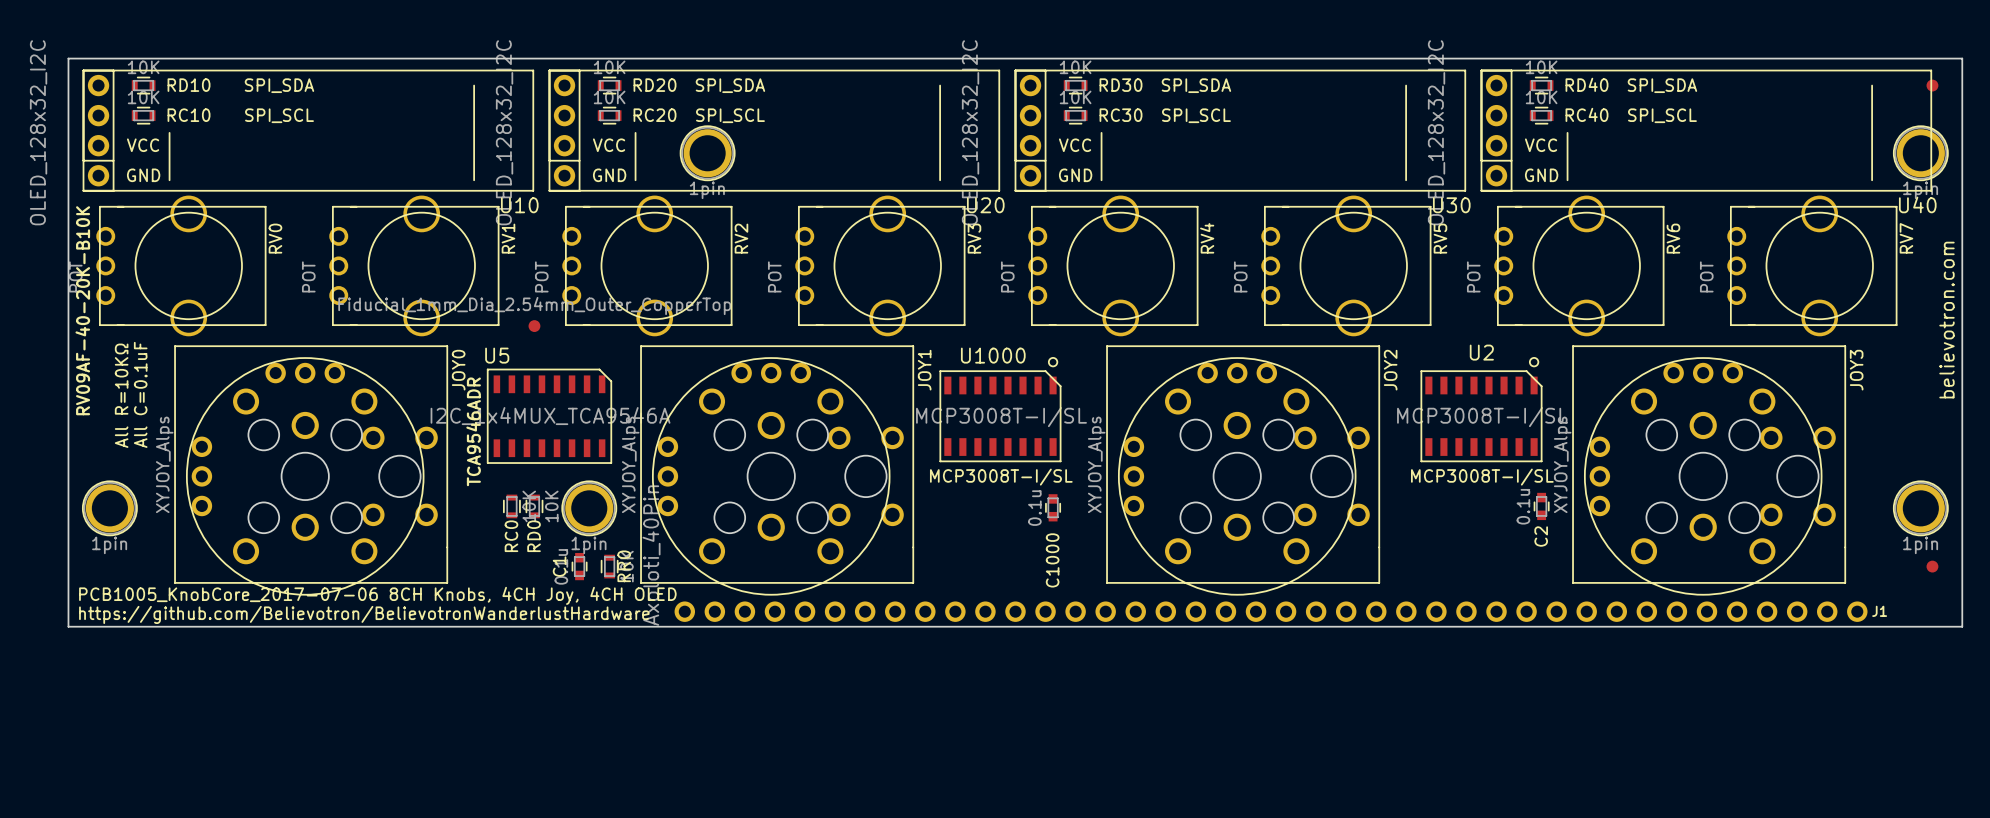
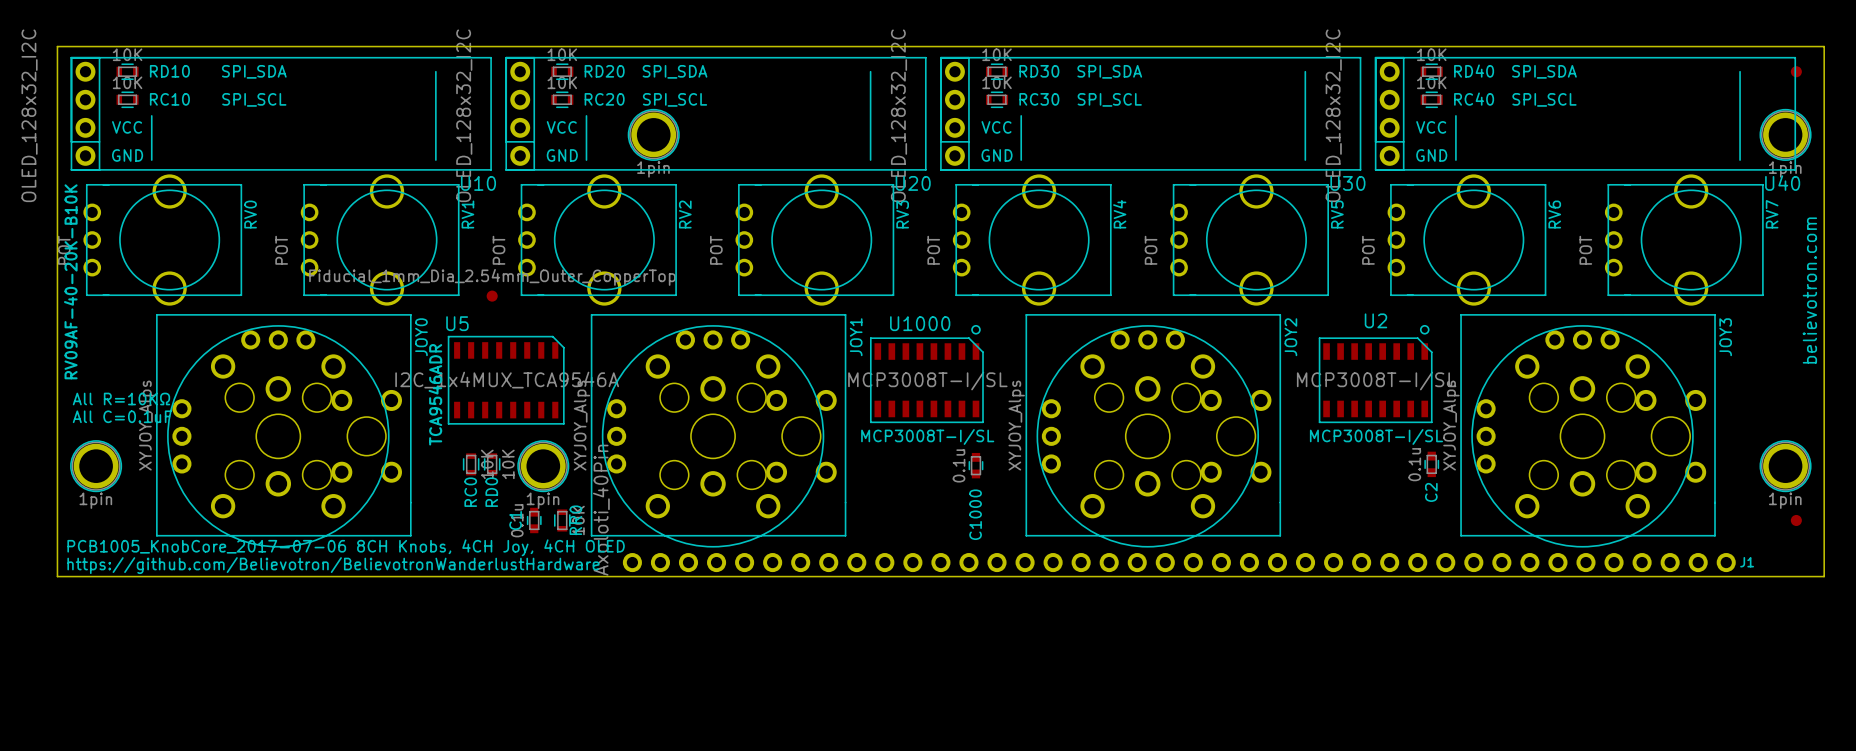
text rotation: 0° (140, 394) -> 90° clockwise (122, 416)
text rotation: 0° (121, 395) -> 90° clockwise (121, 398)

